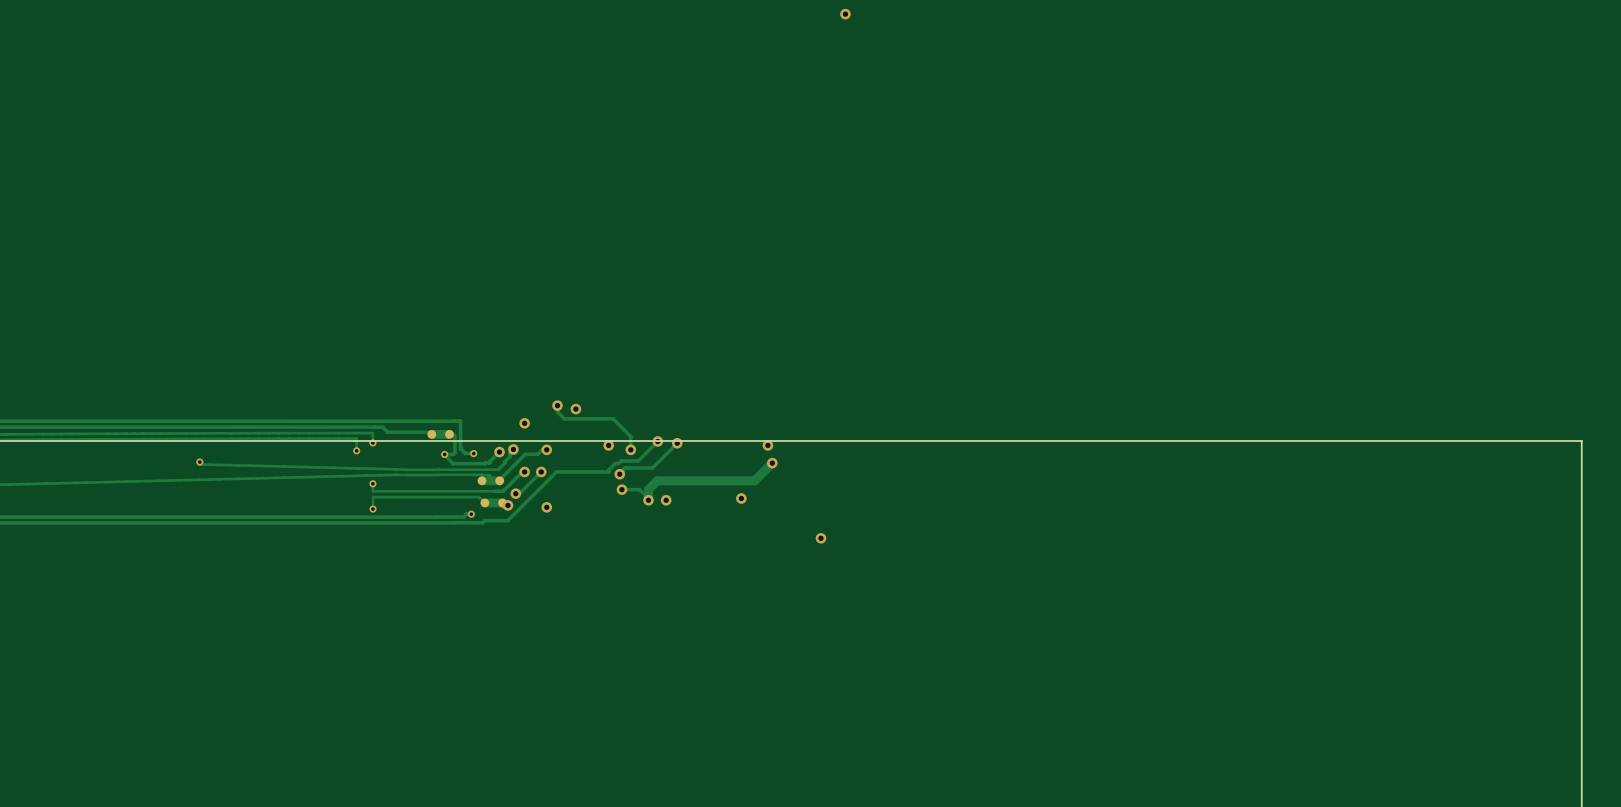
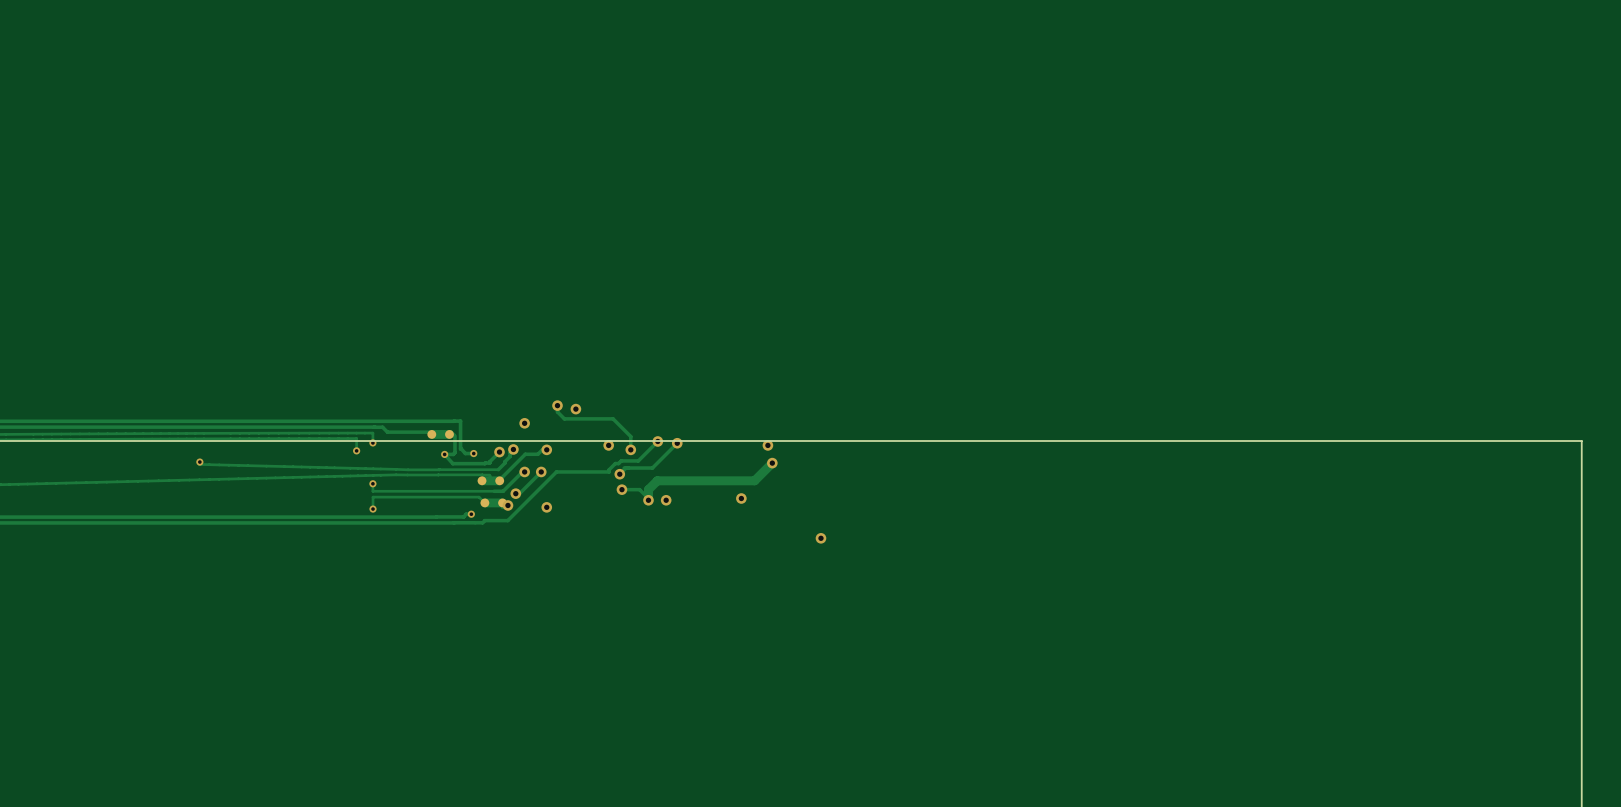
via: (845, 14) -> none

